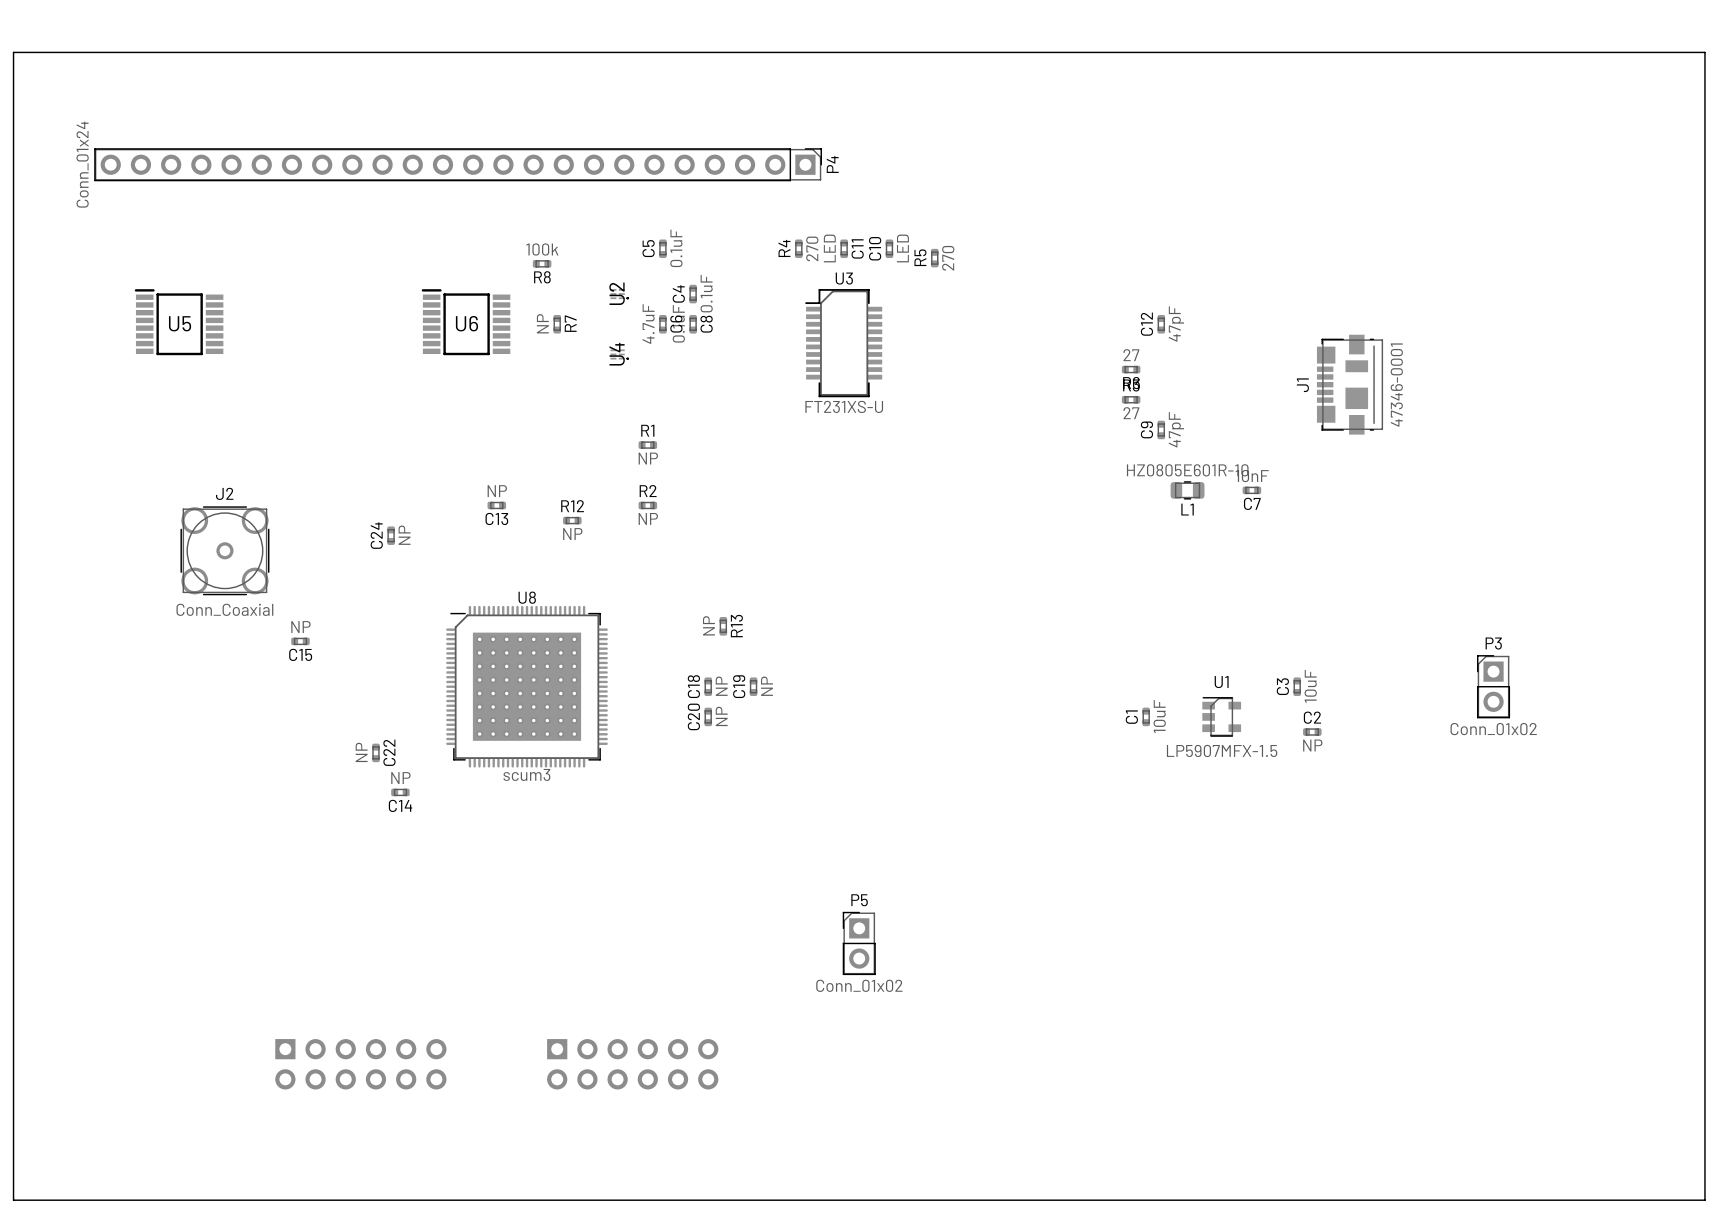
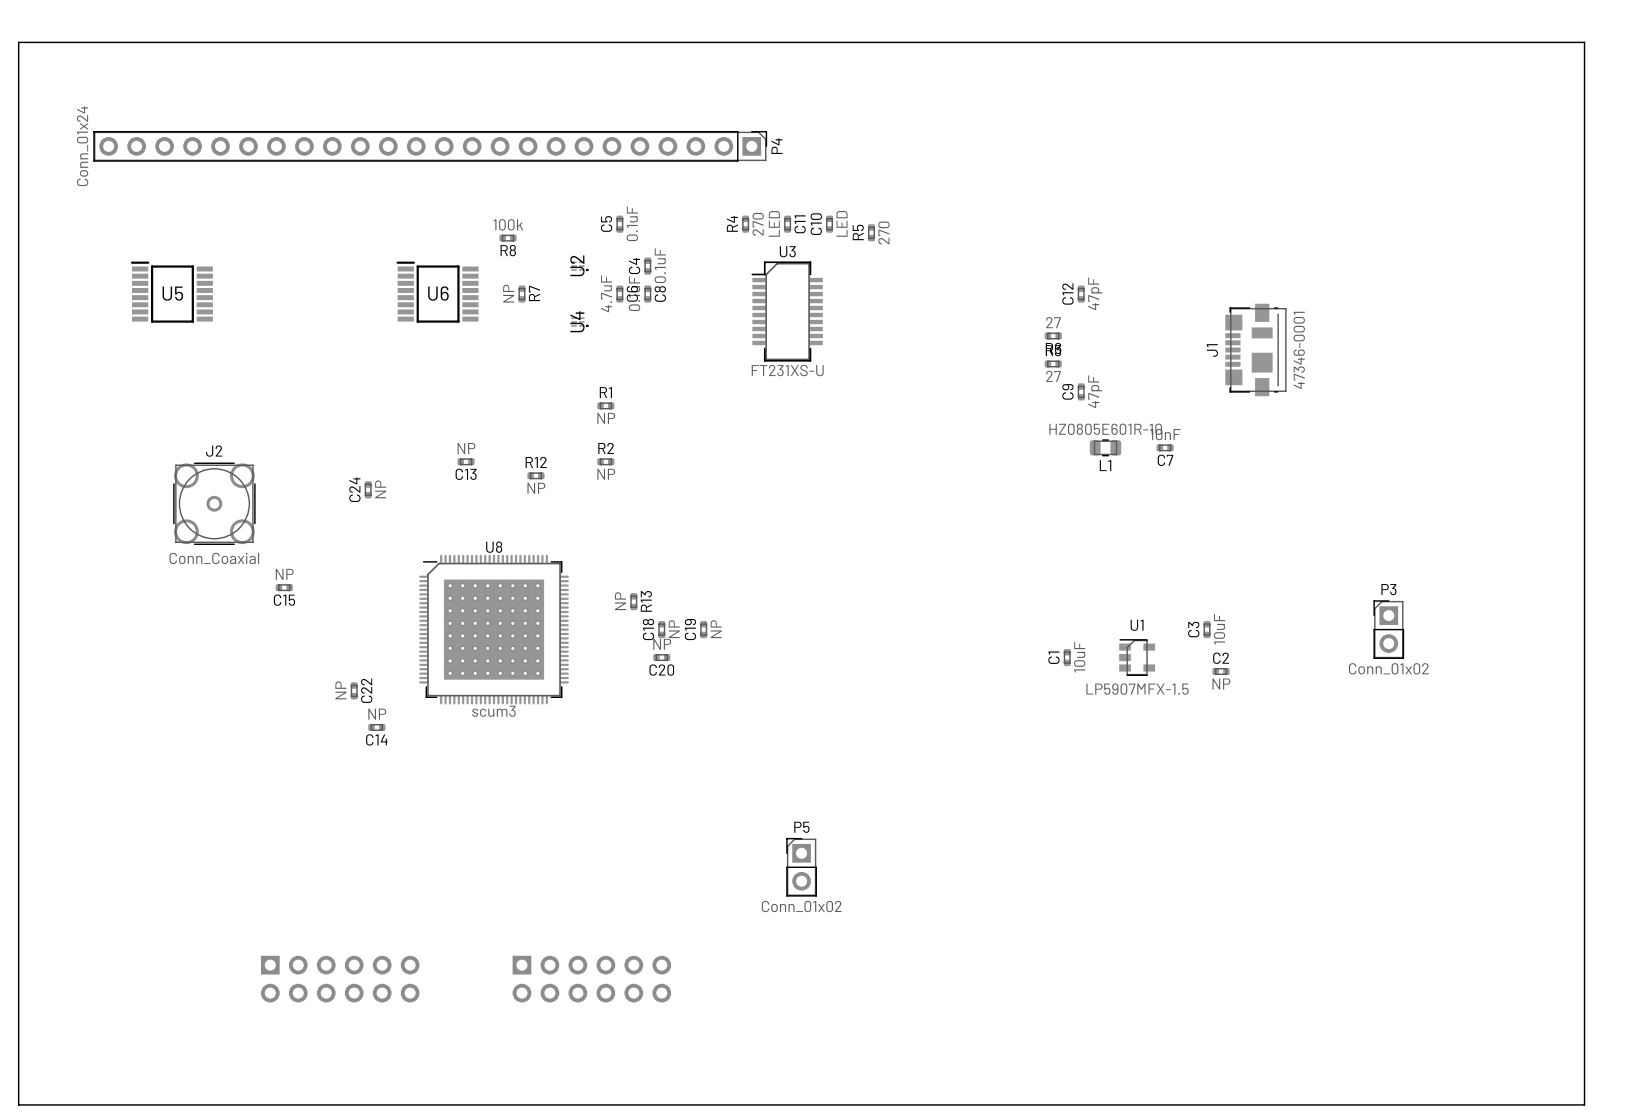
R13 position: (723, 626) -> (633, 601)
C20 rotation: 0° (708, 716) -> 90° clockwise (661, 657)

